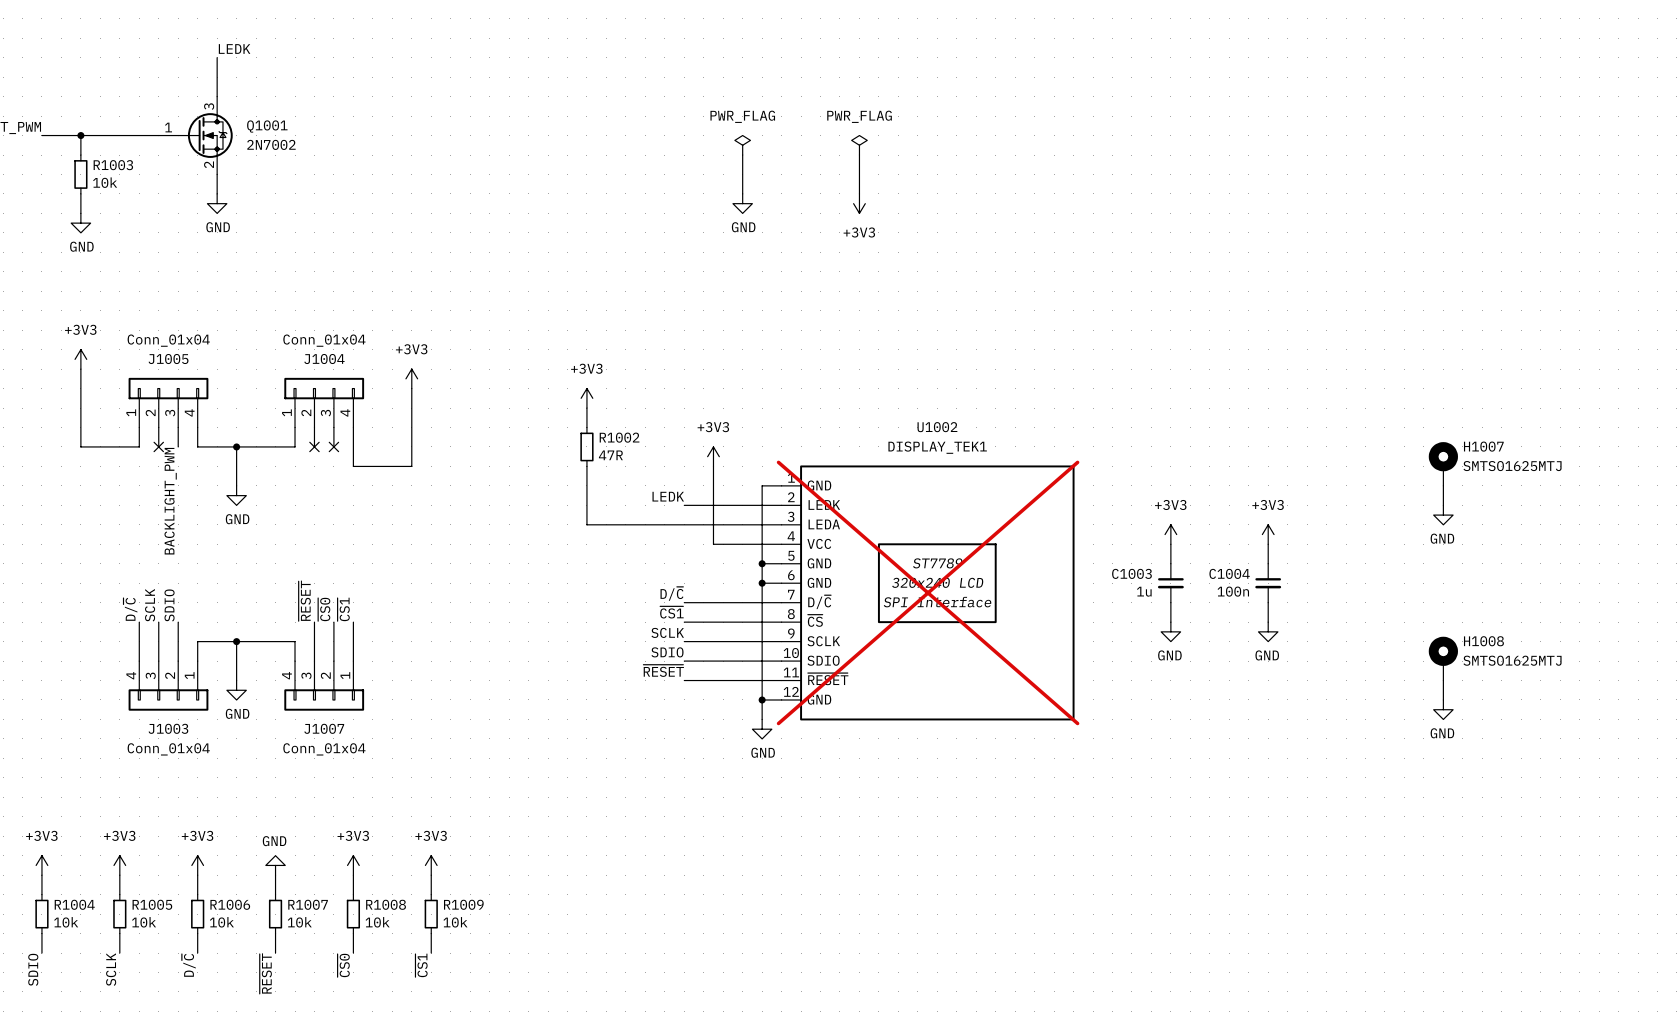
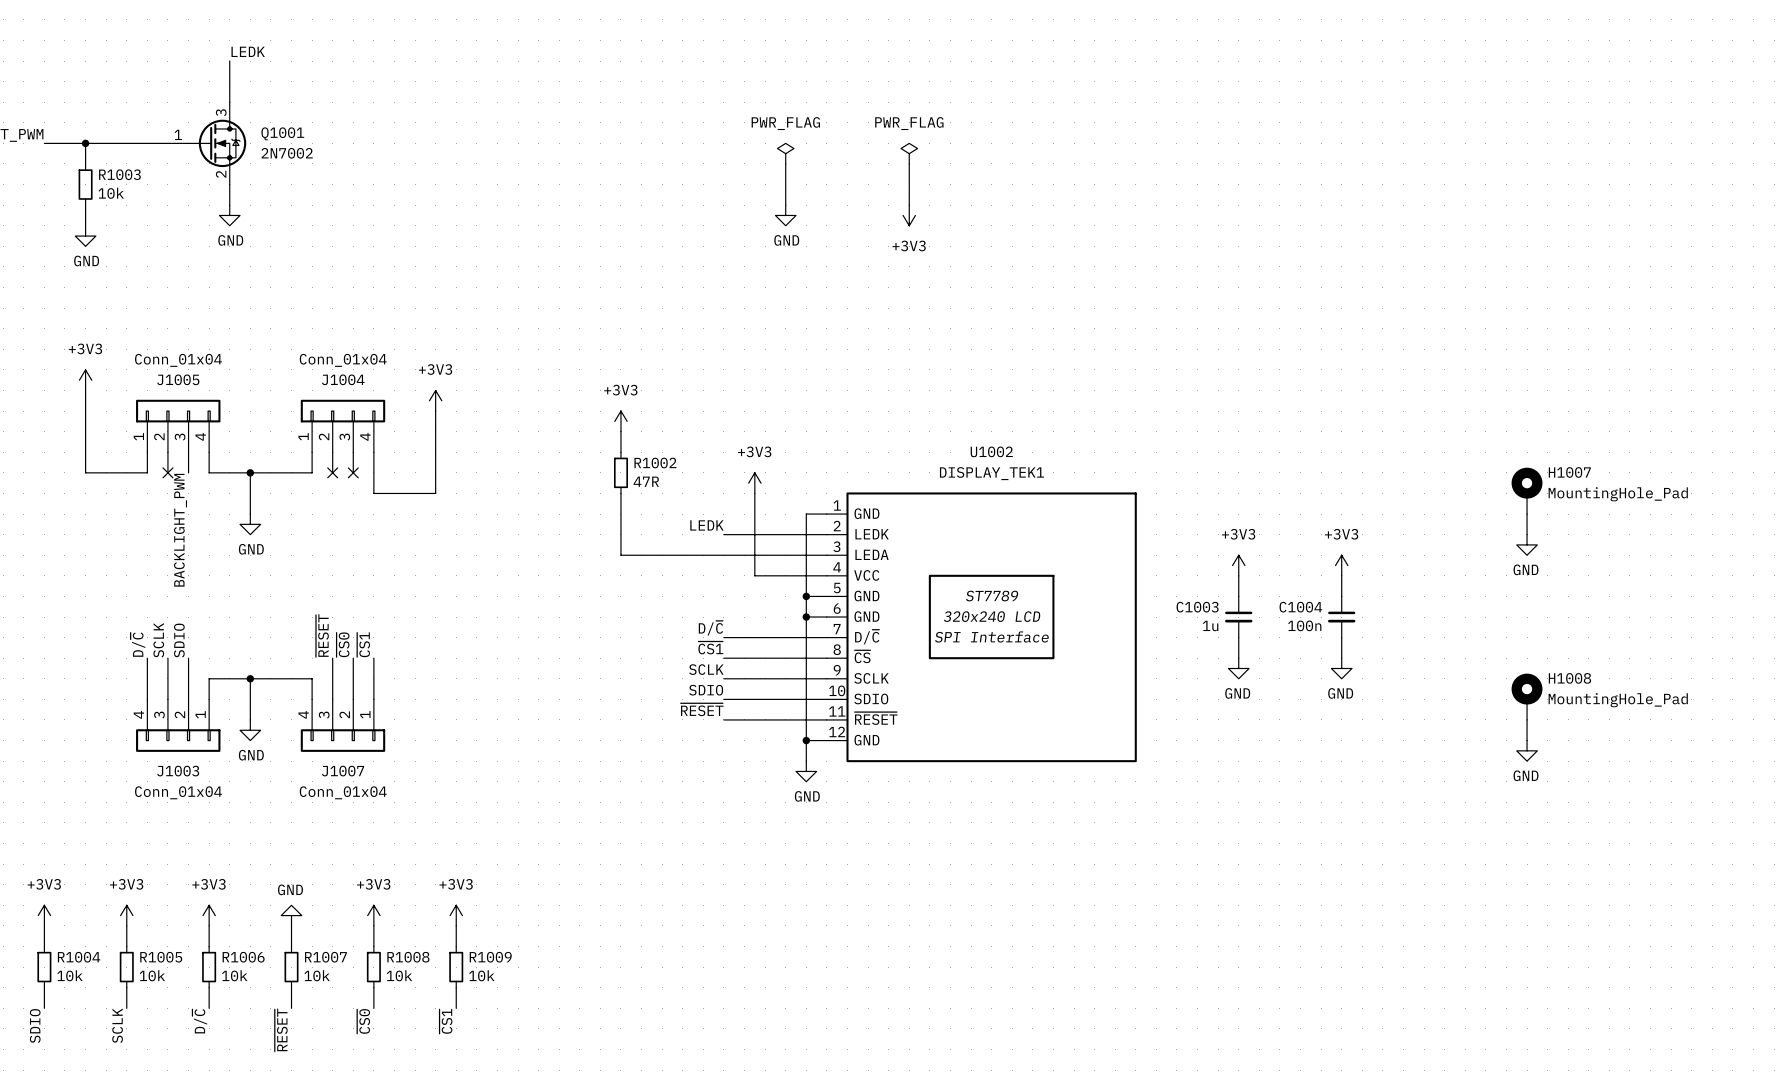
H1007 value: SMTSO1625MTJ (1512, 466) -> MountingHole_Pad (1618, 494)
U1002 do-not-place cross: (928, 592) -> none
H1008 value: SMTSO1625MTJ (1512, 660) -> MountingHole_Pad (1618, 700)

